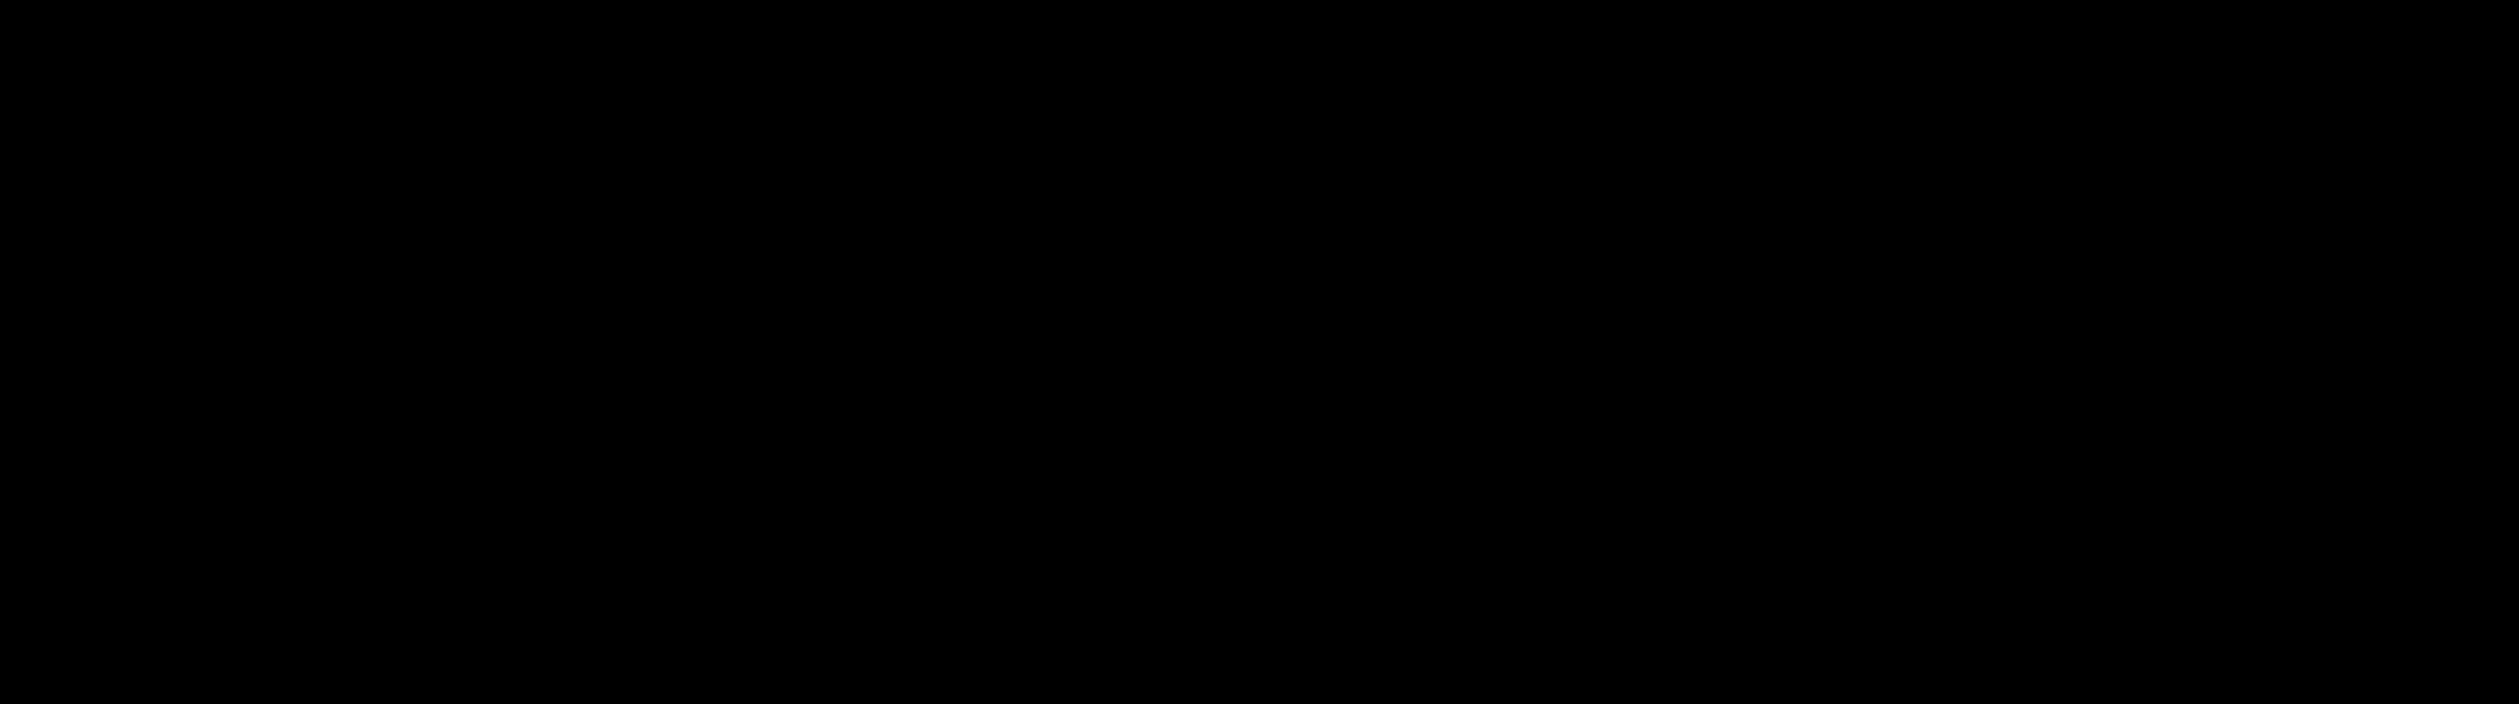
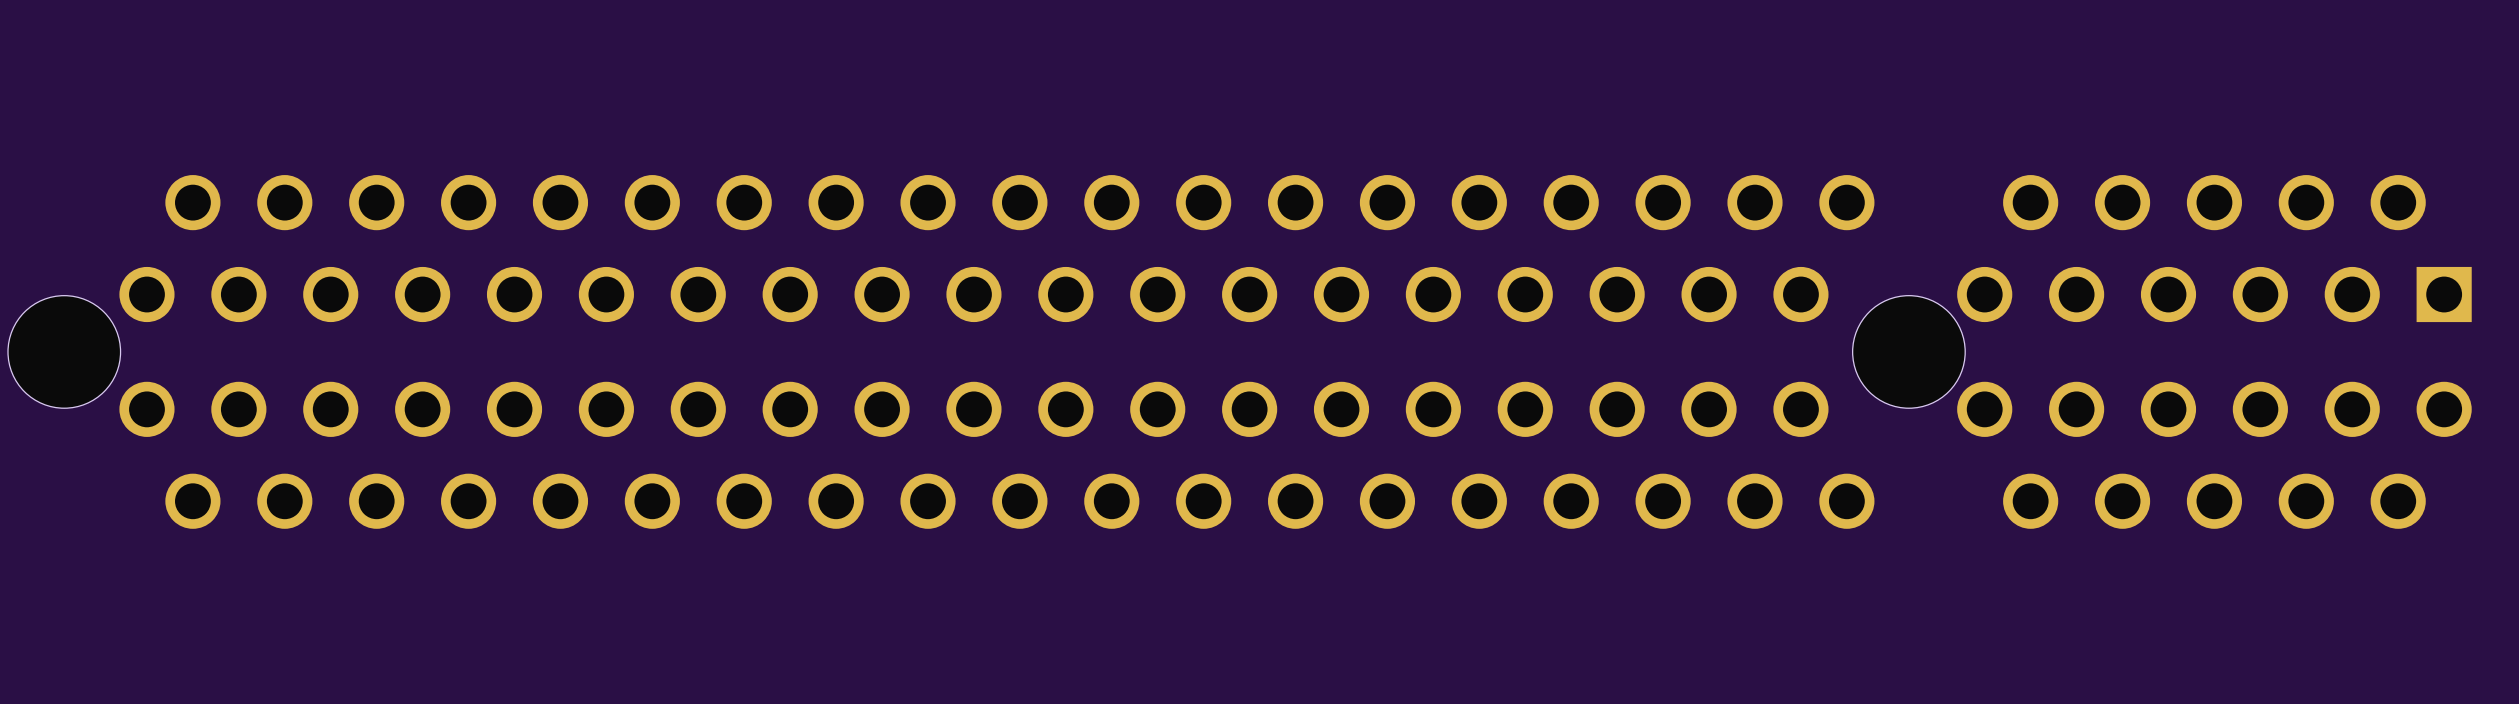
part: none -> (1239, 351)

